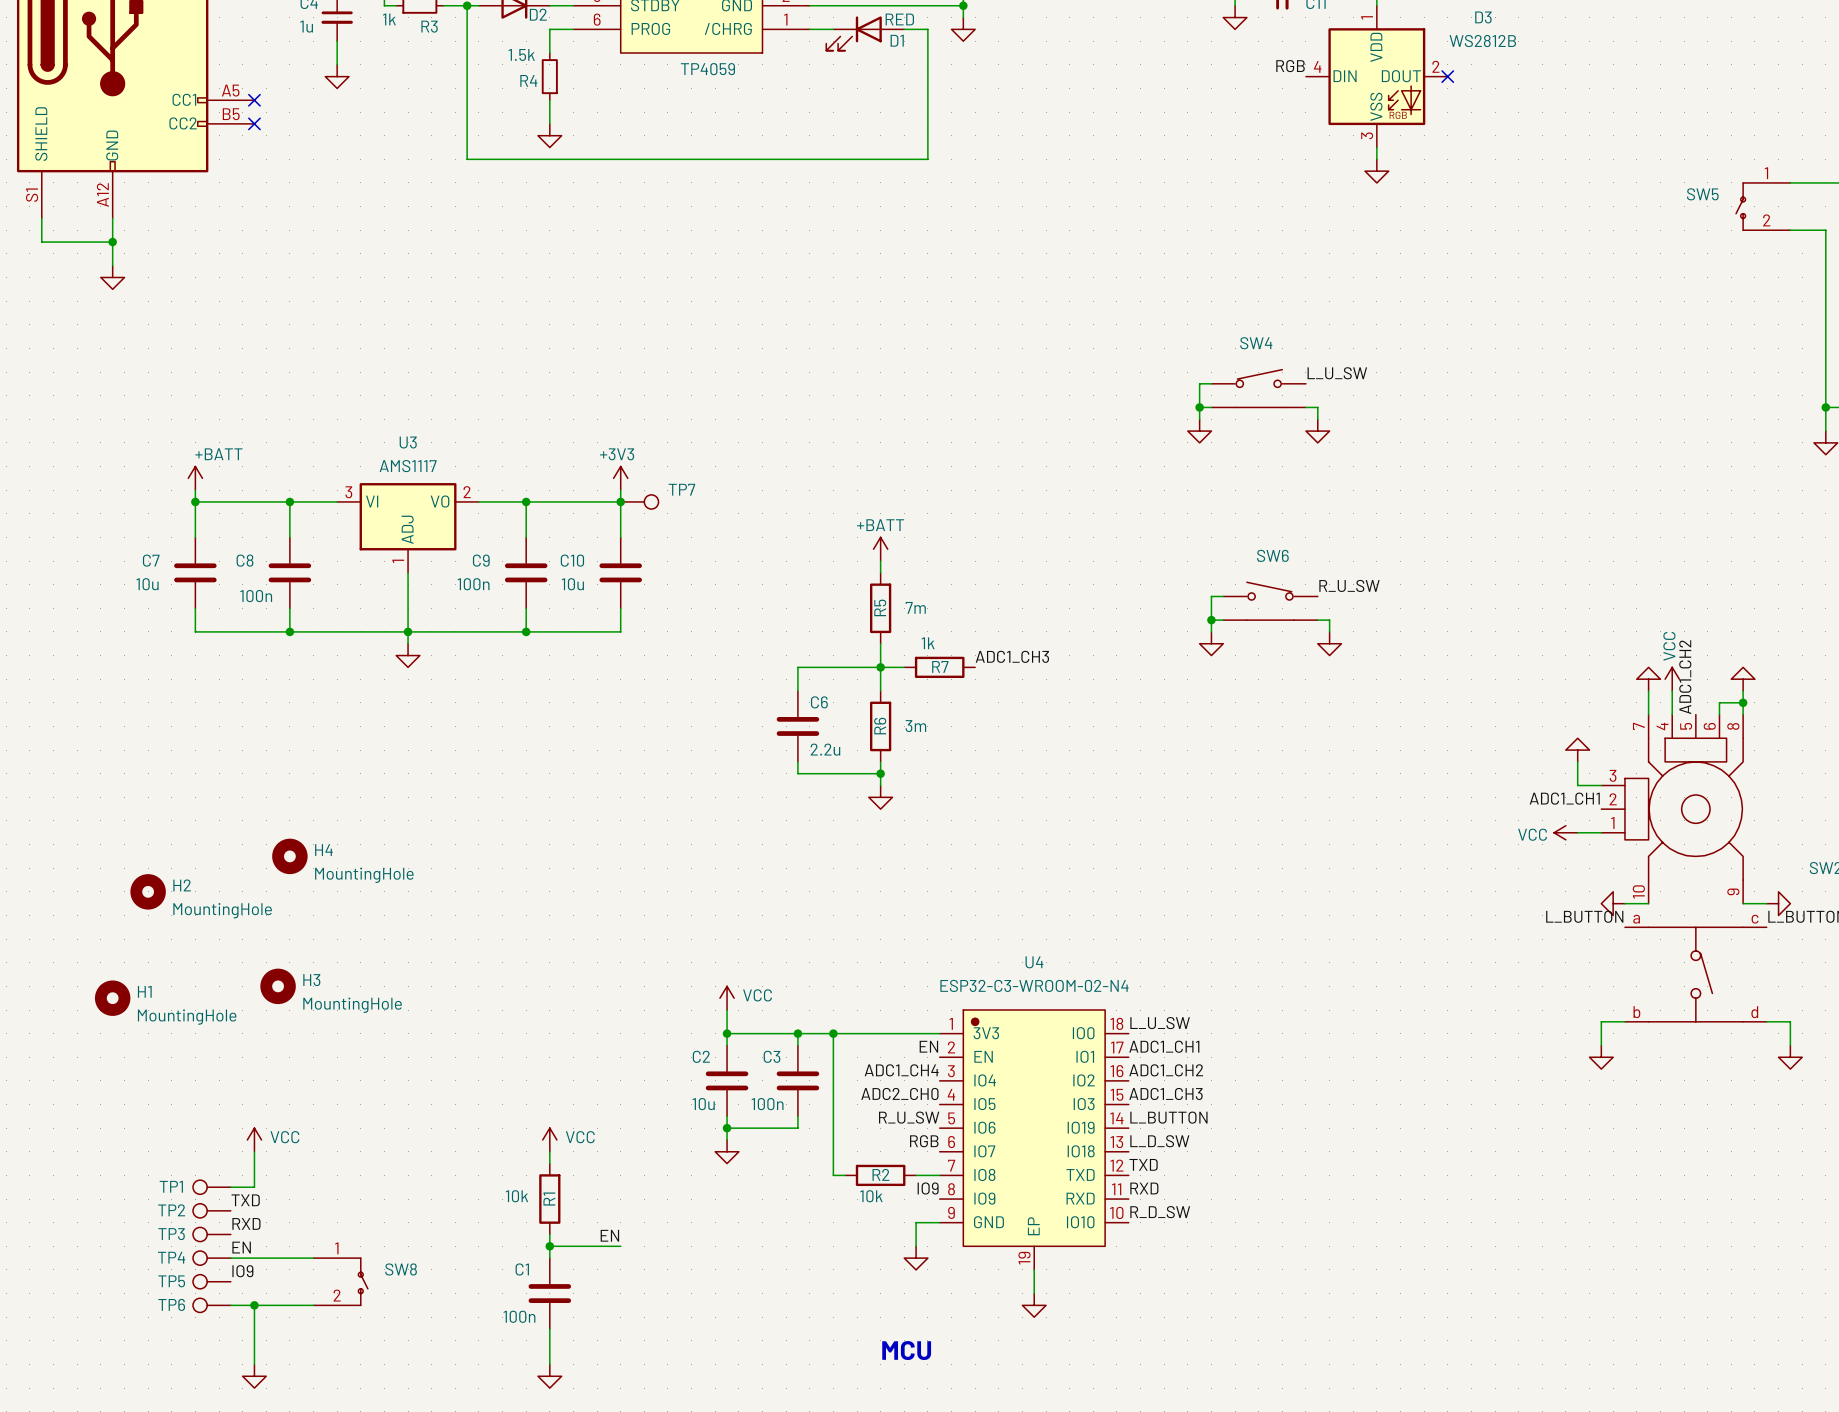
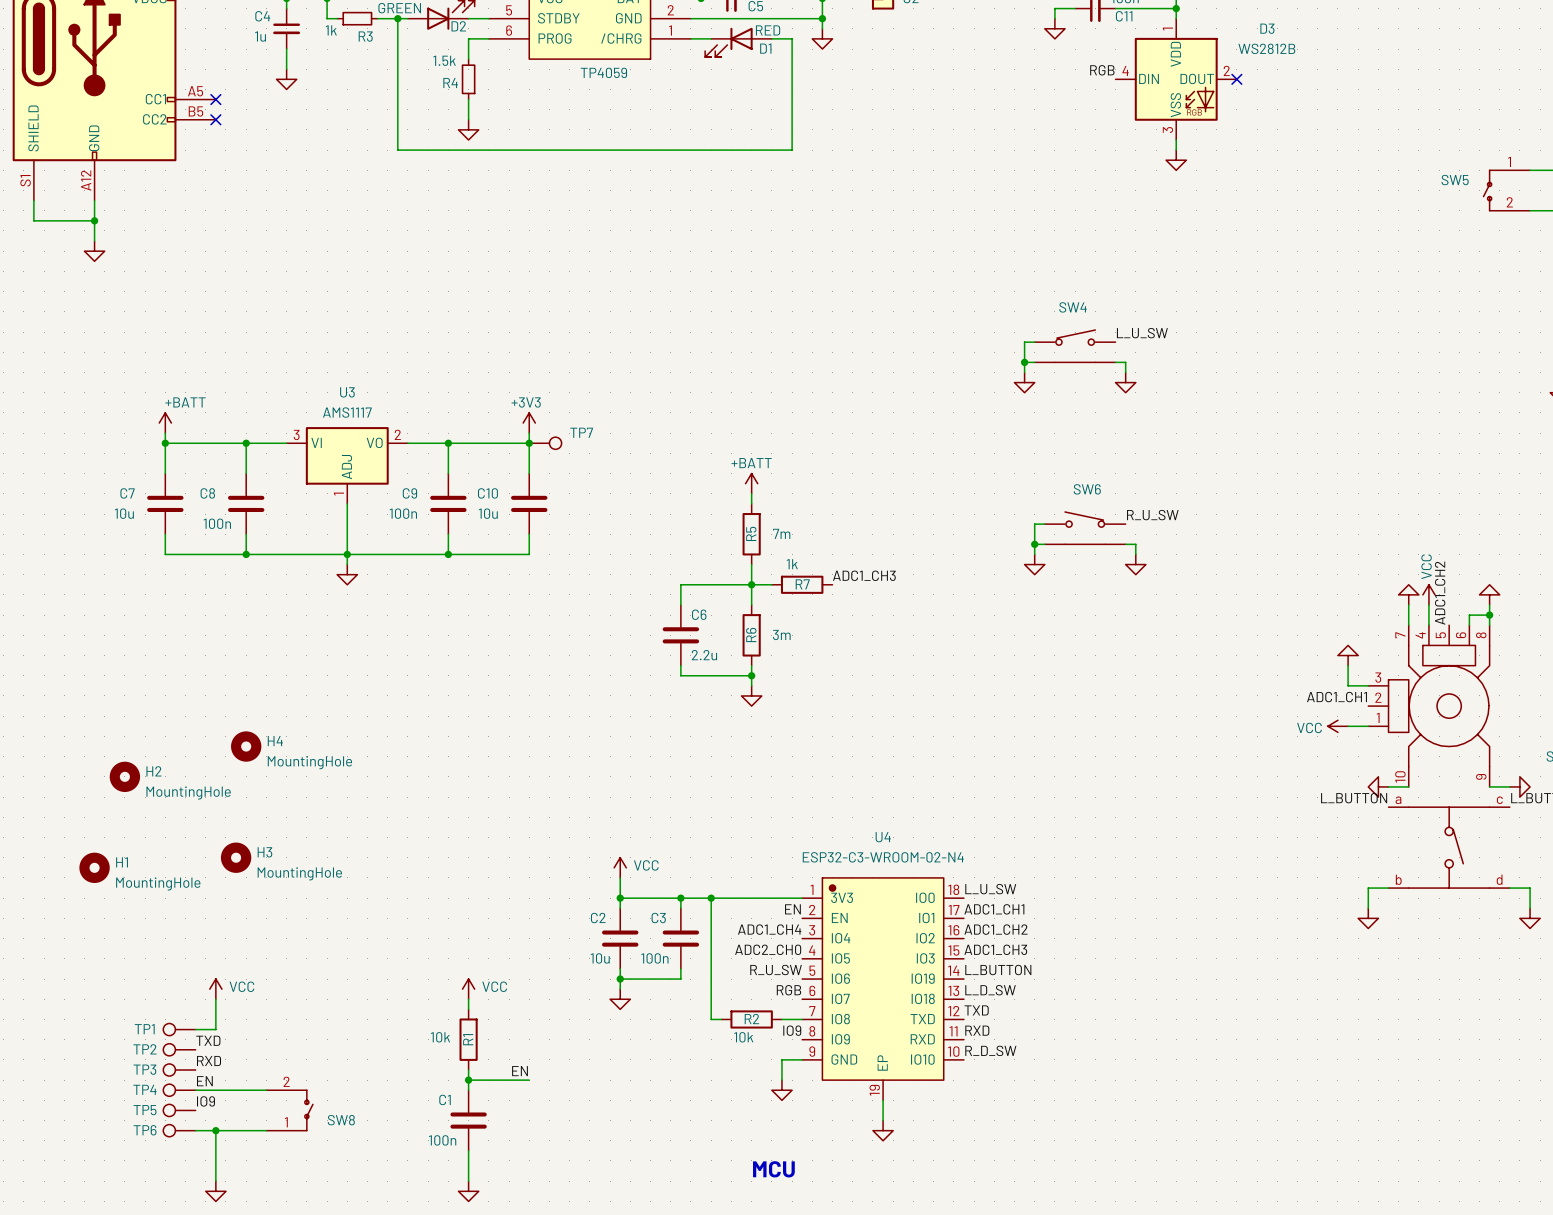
SW8 flip: as is (363, 1281) -> up-down (308, 1110)

